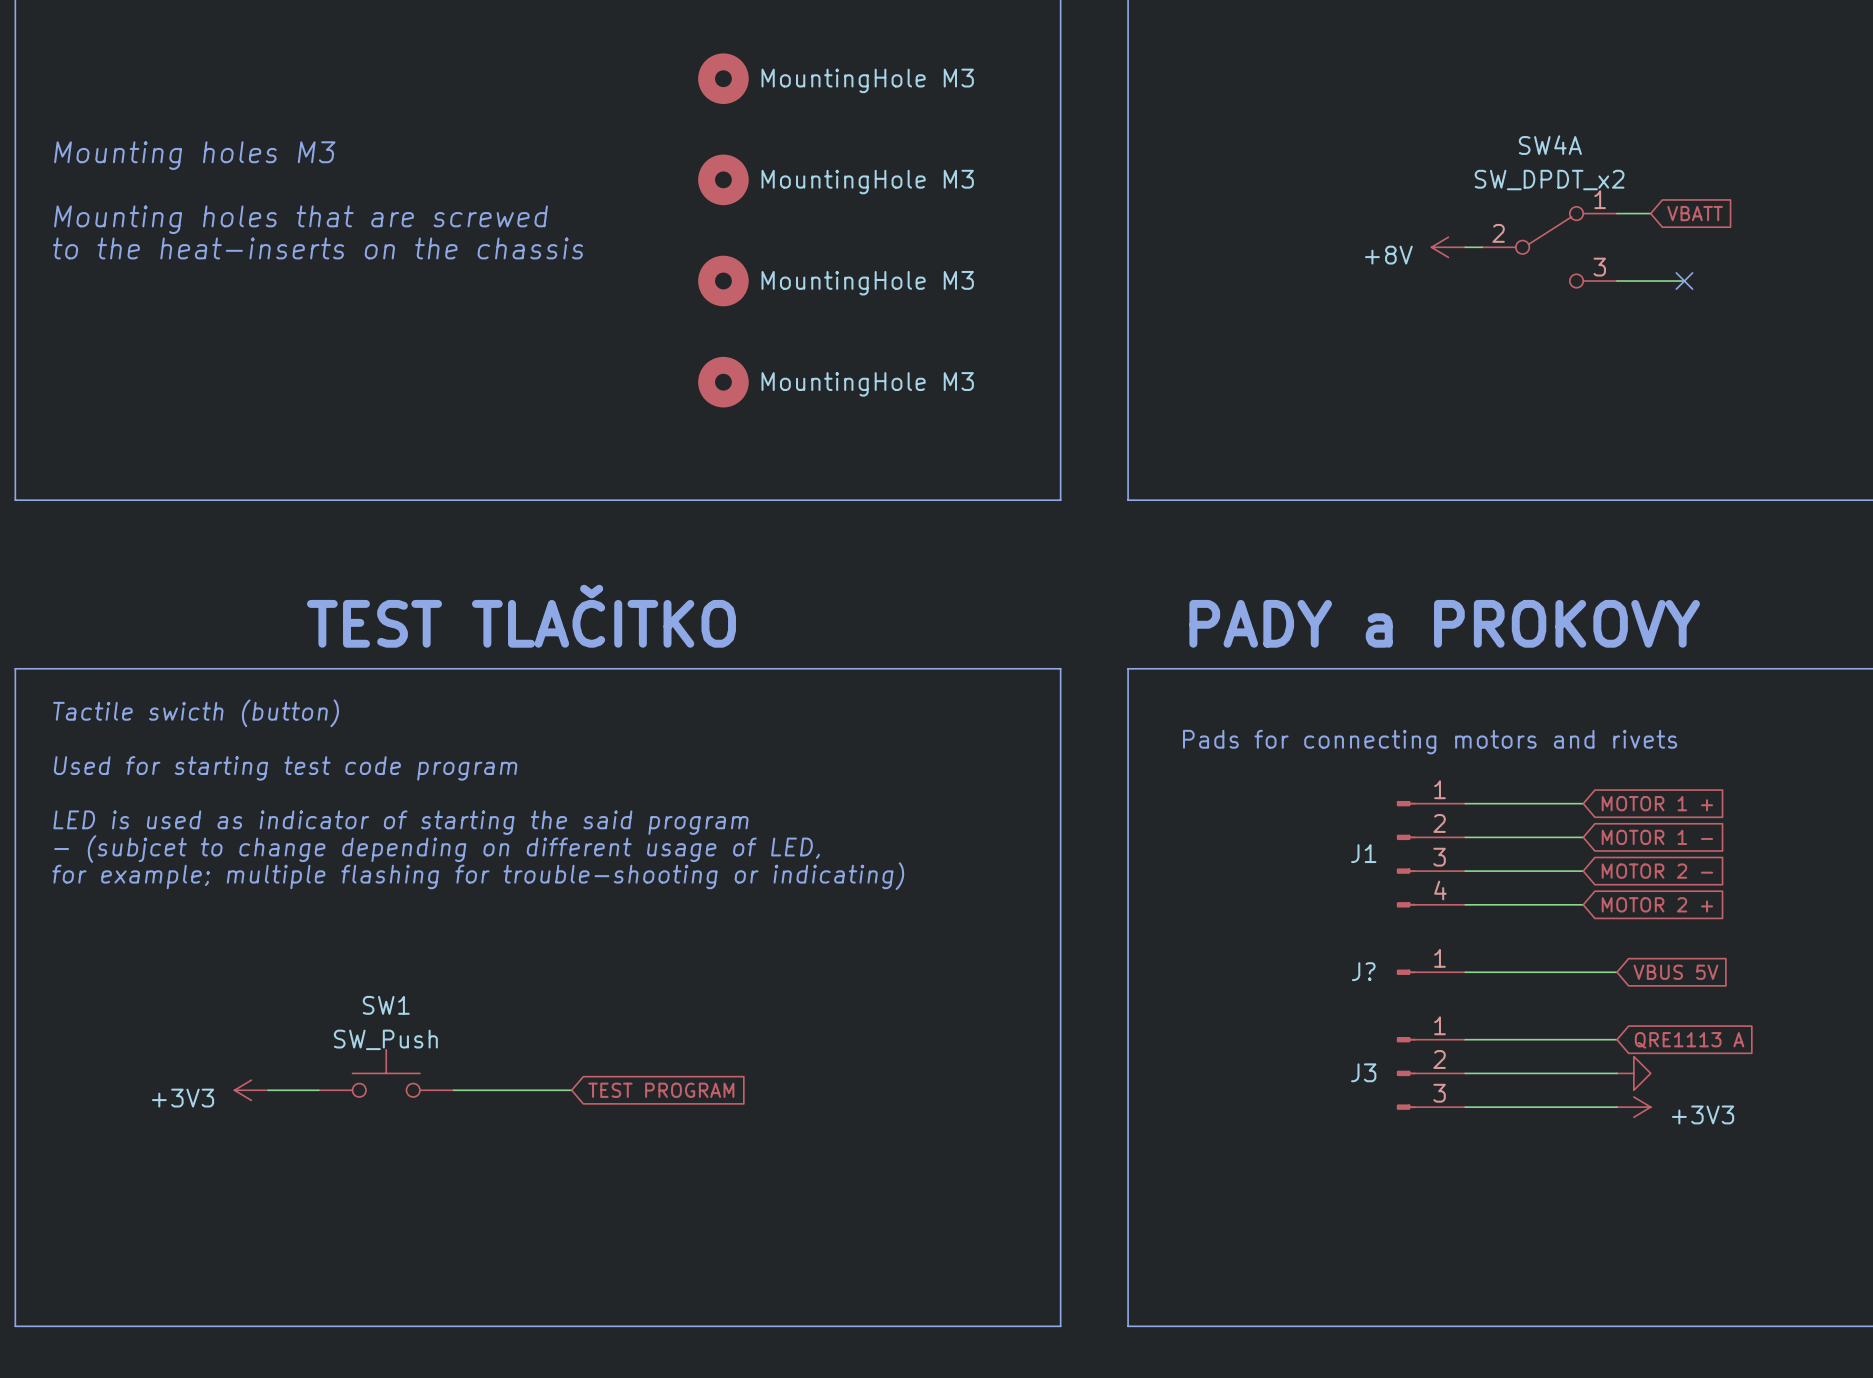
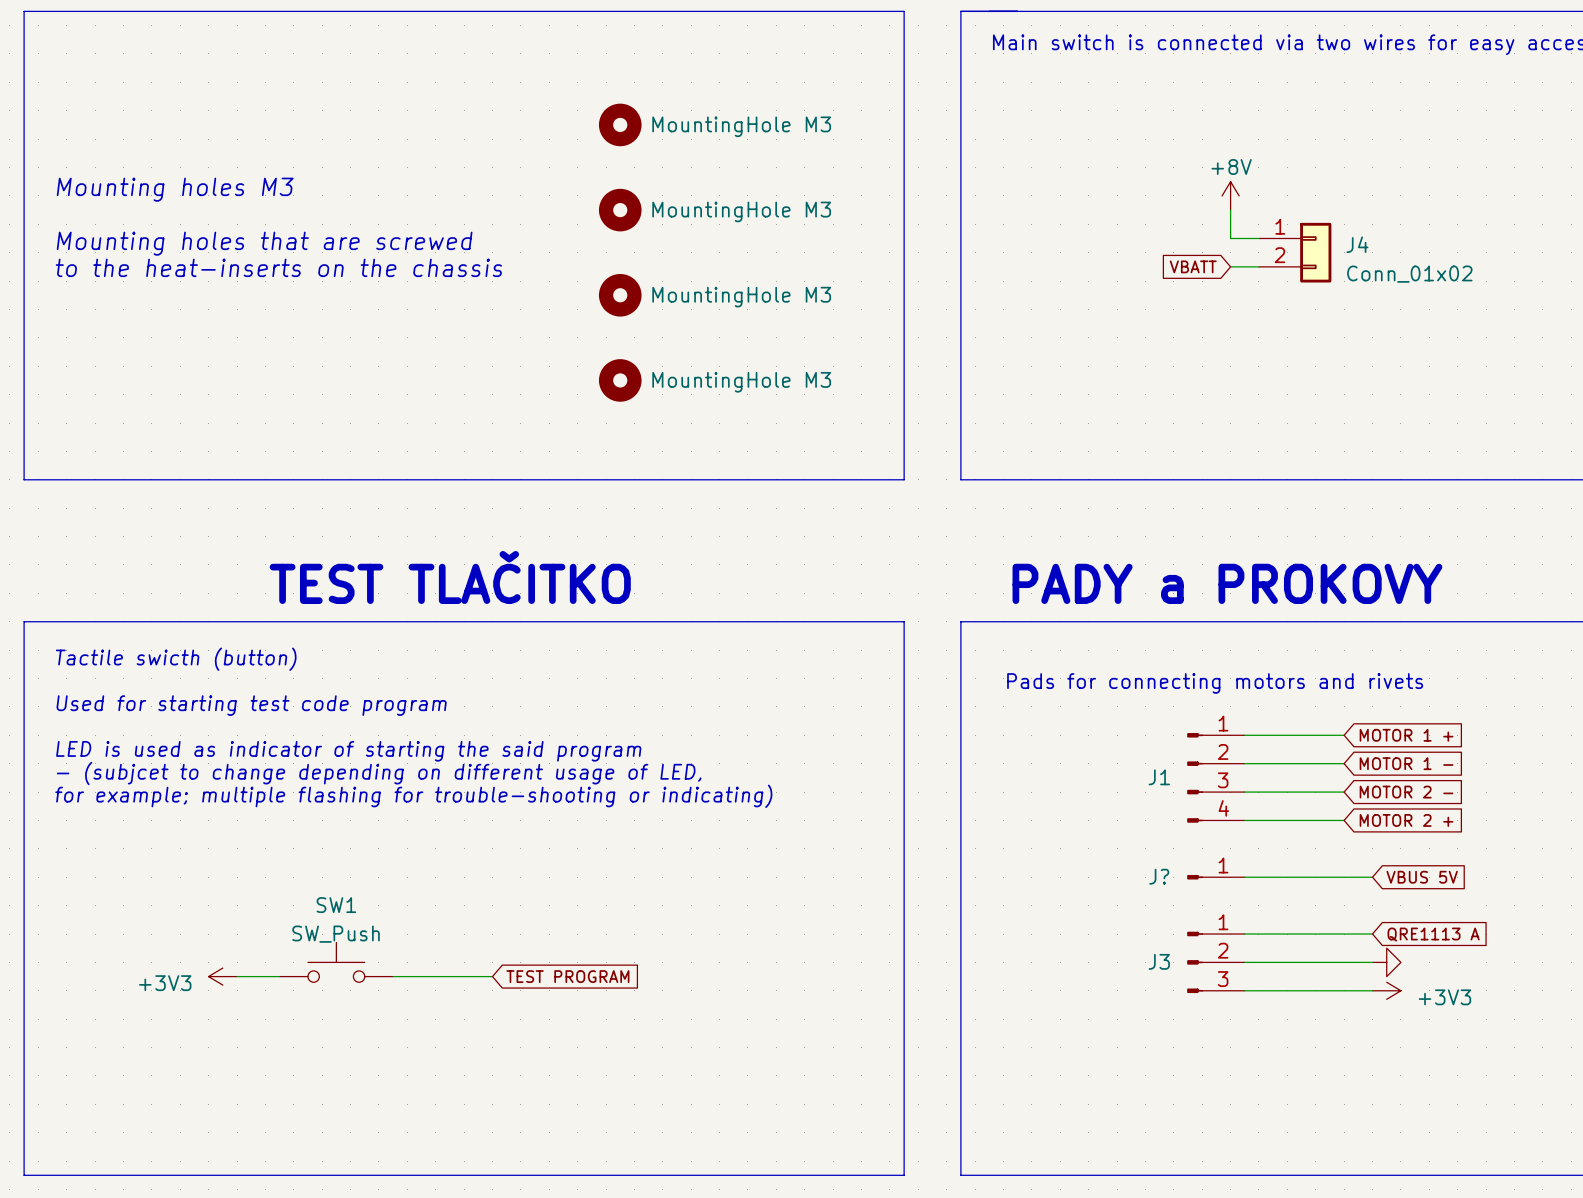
wire: none -> (1230, 210) (1230, 238) (1258, 238)
wire: (1617, 213) (1650, 213) -> none
global label rotation: 0° (1695, 213) -> 180° (1193, 266)
global label position: VBATT (1695, 213) -> VBATT (1193, 266)
J4: none -> Conn_01x02 (1295, 252)
power symbol rotation: 0° (1448, 247) -> 90° clockwise (1230, 195)
power symbol position: +8V (1448, 247) -> +8V (1230, 195)
SW4A: SW_DPDT_x2 (1549, 247) -> none
power symbol text position: +8V (1388, 255) -> +8V (1231, 166)
wire: (1617, 281) (1684, 281) -> none
no-connect mark: (1684, 281) -> none

